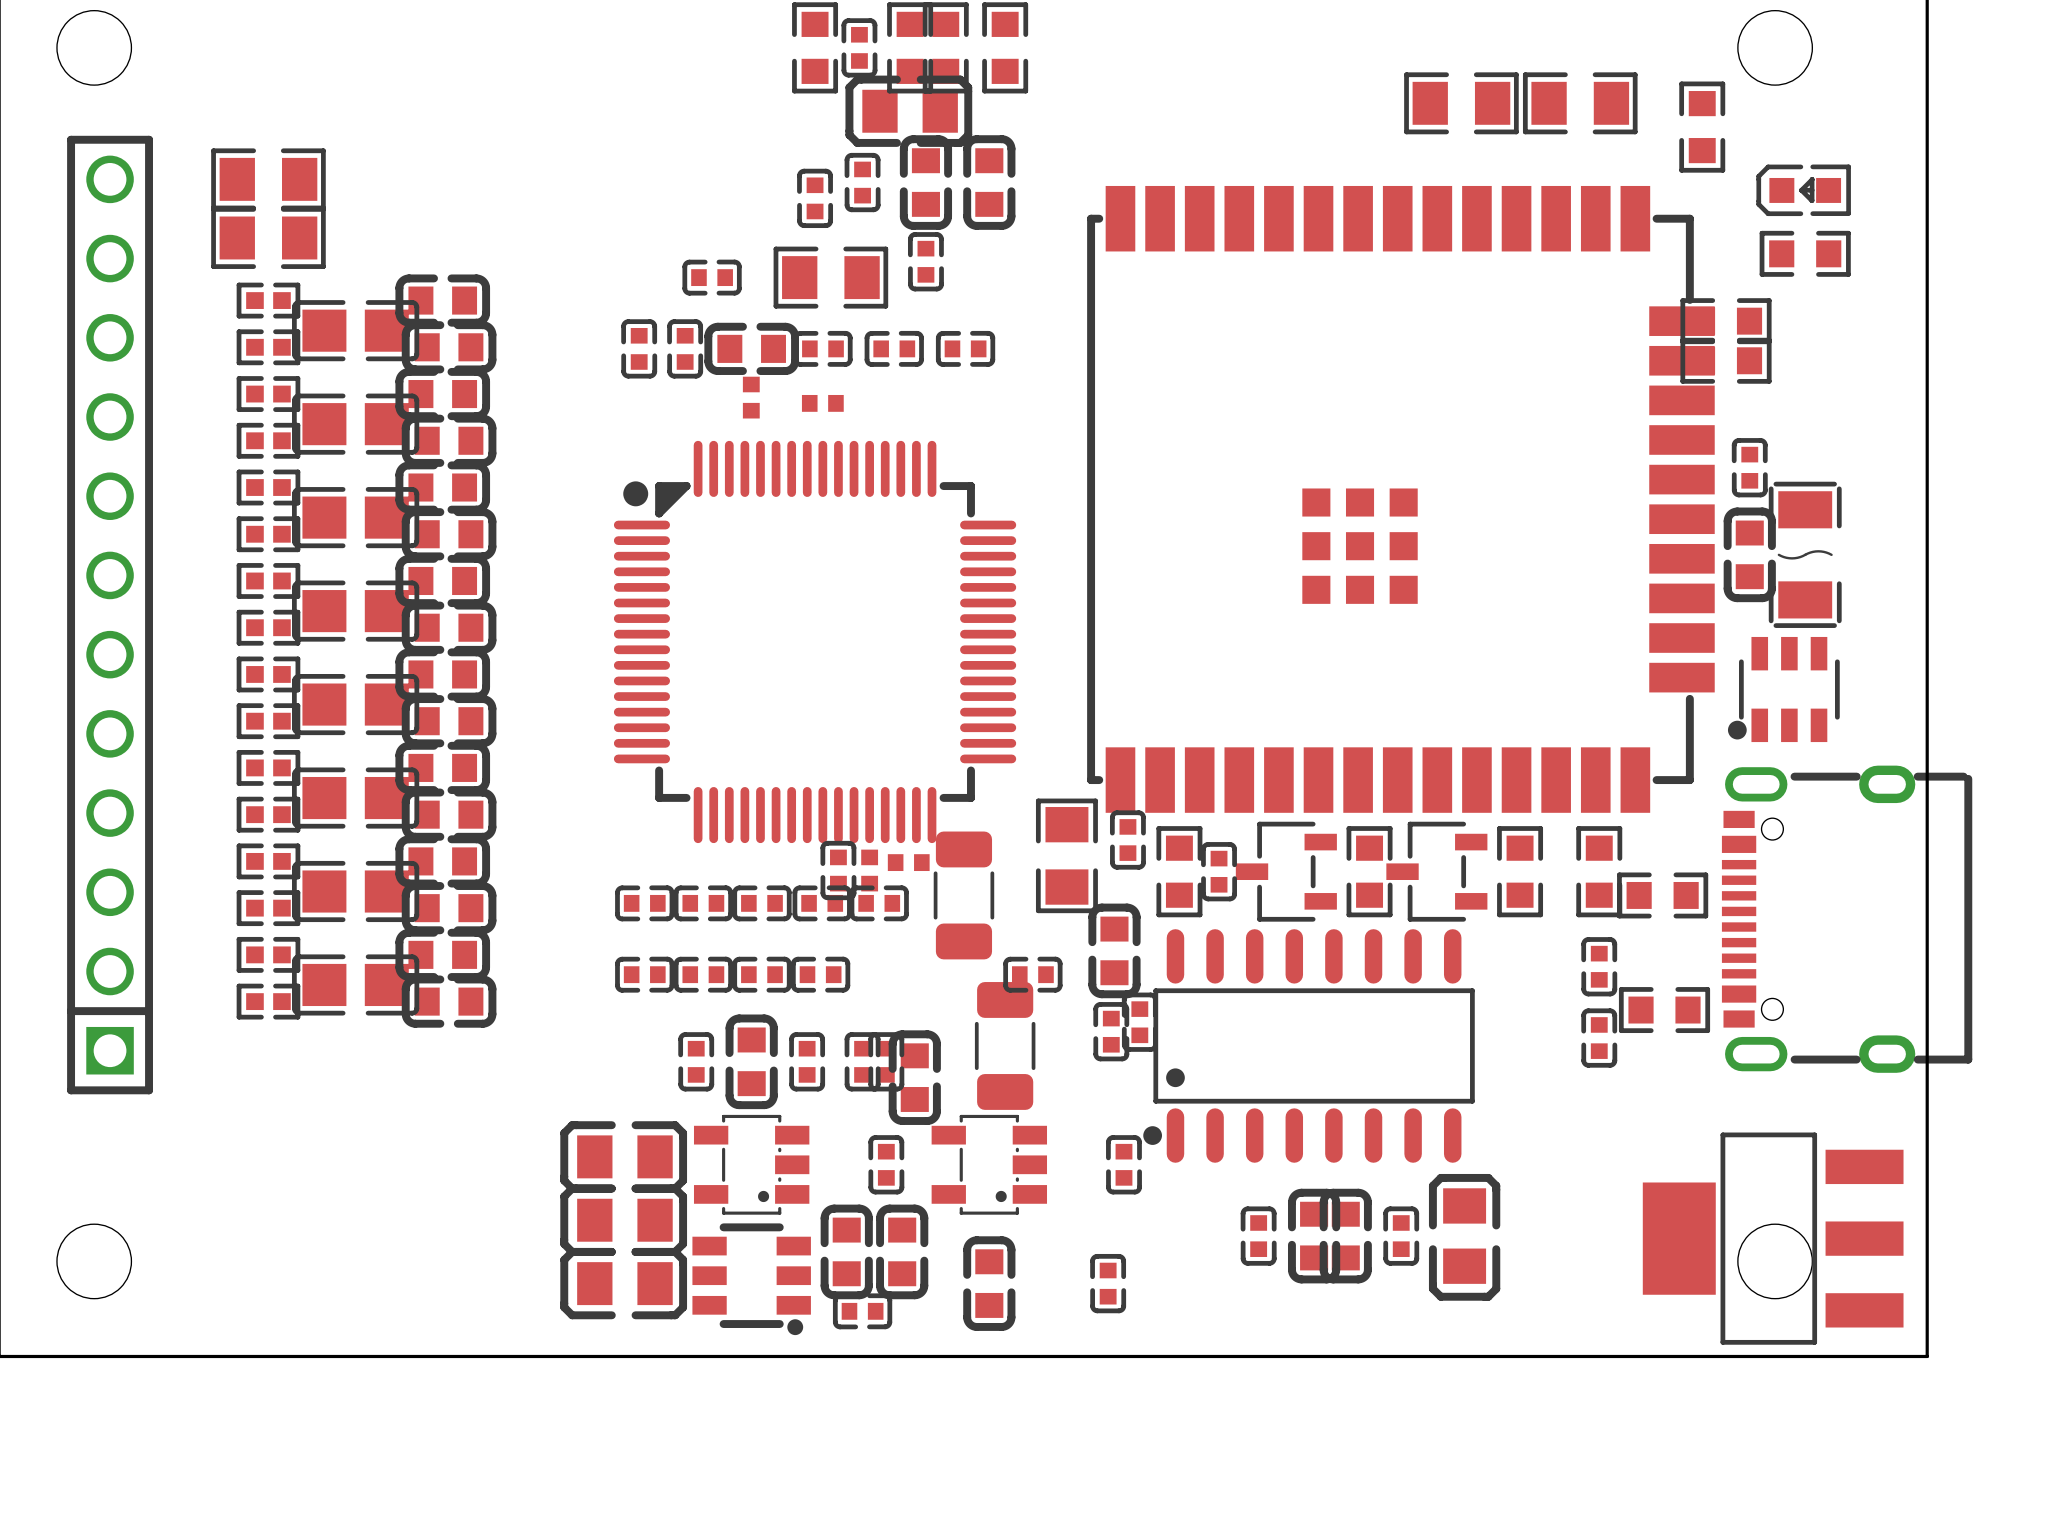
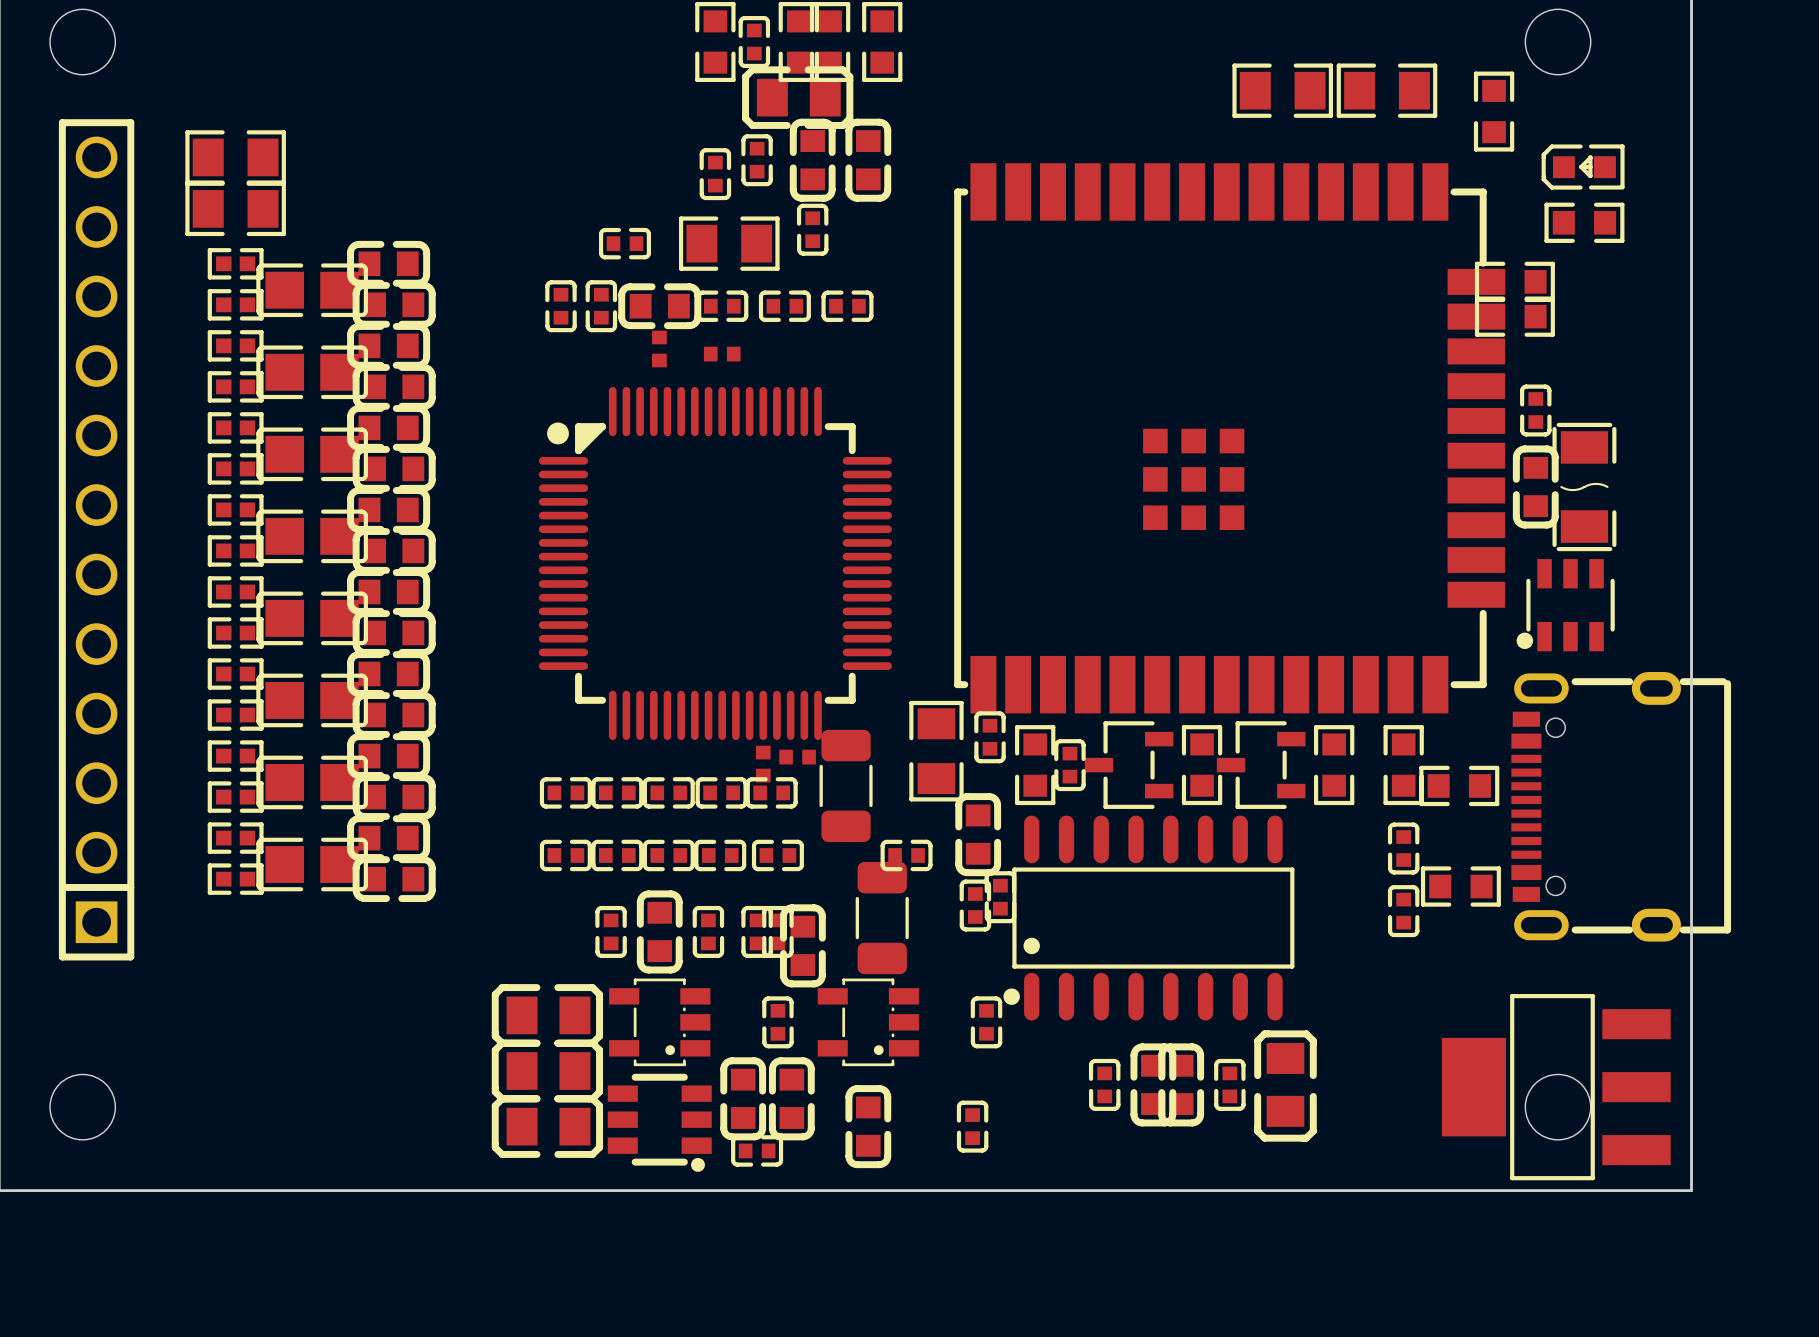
part rotation: 0° (838, 870) -> 90° clockwise (777, 855)
part position: (838, 870) -> (777, 855)

